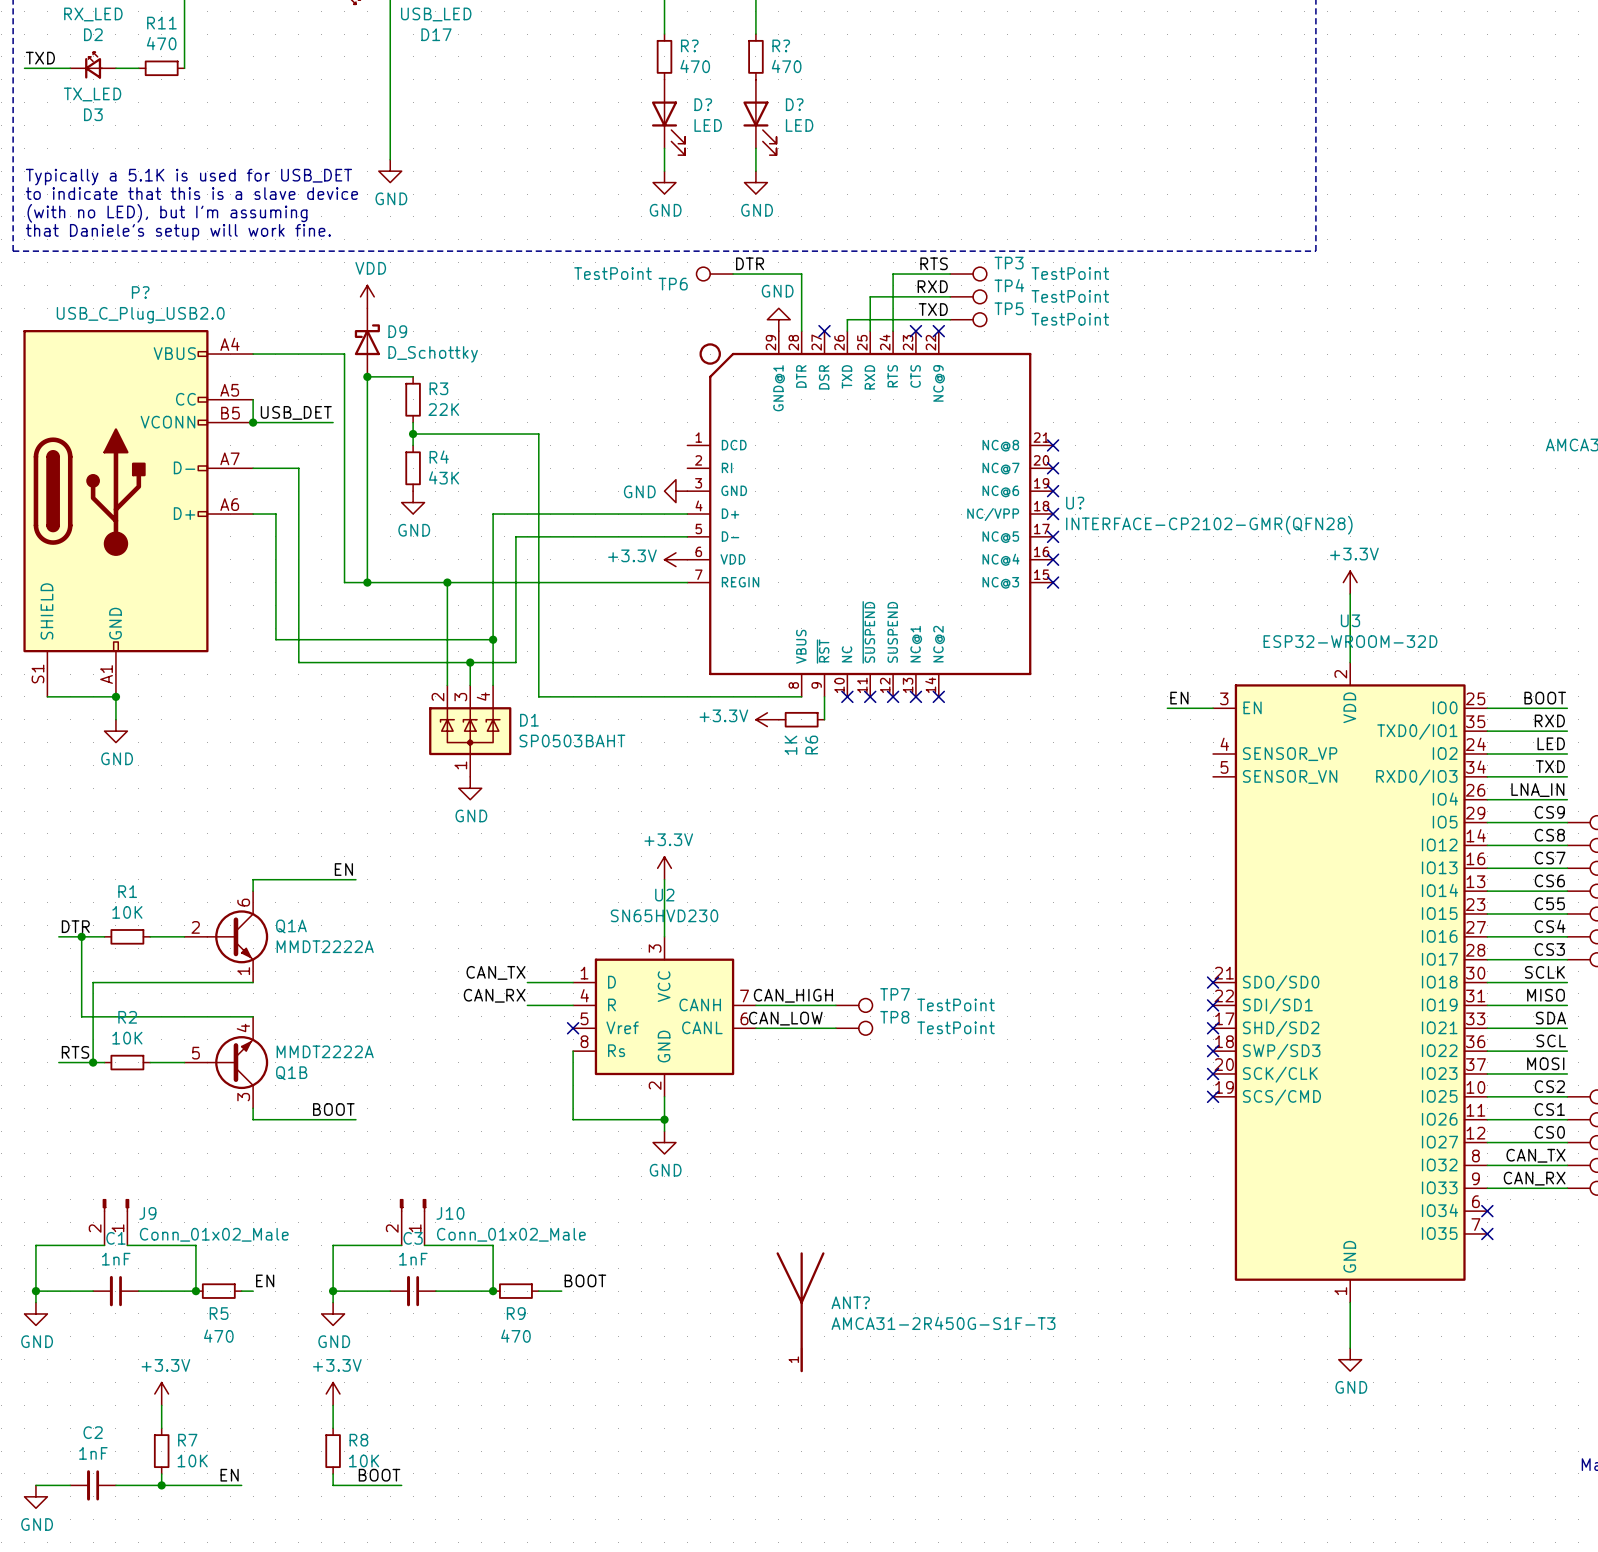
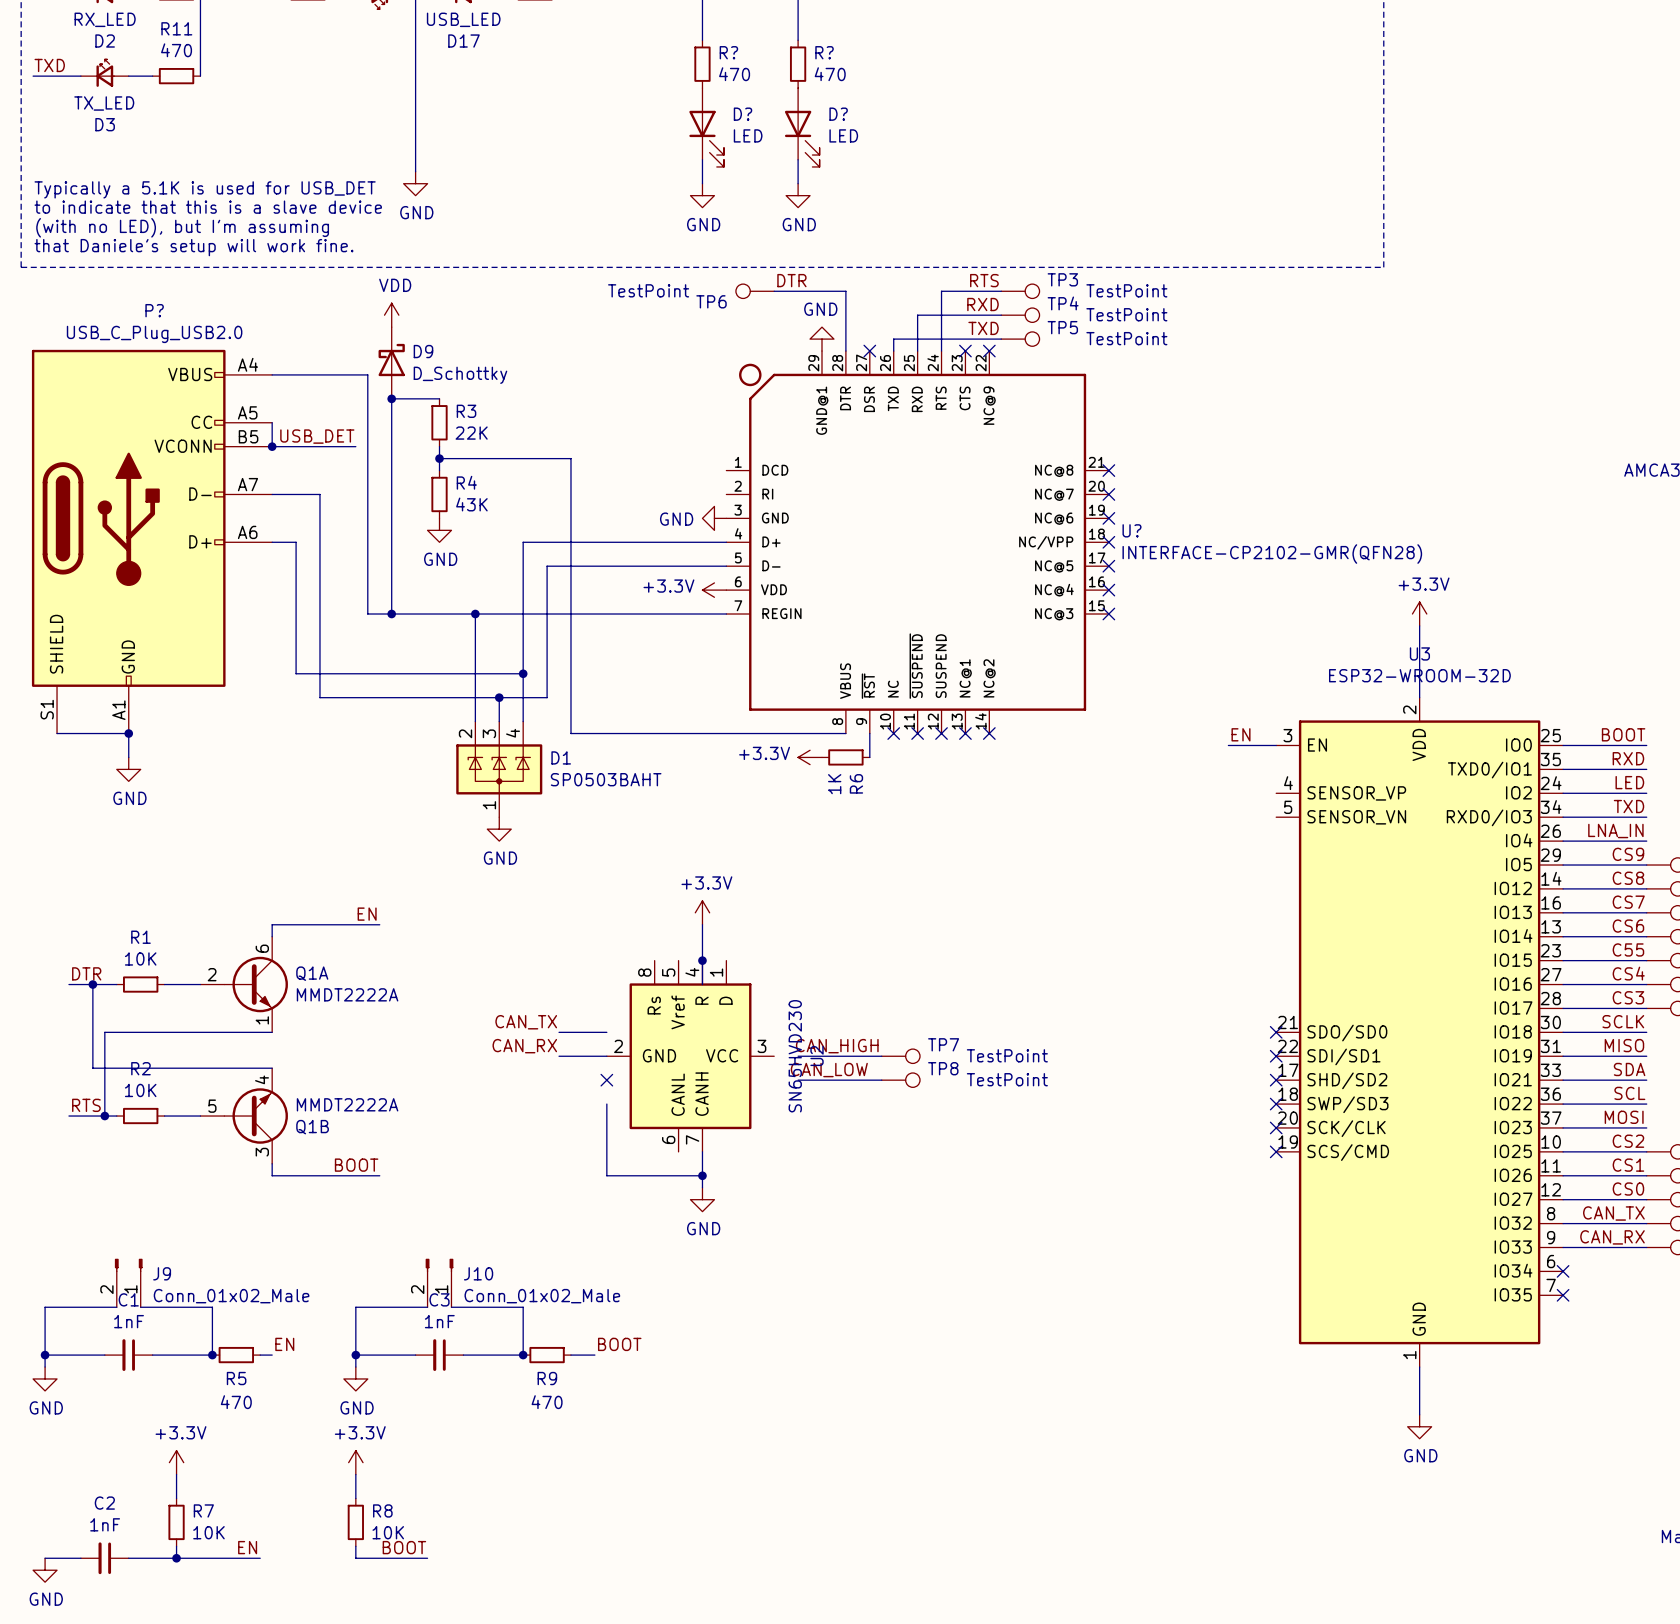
junction: none -> (702, 960)
U2 rotation: 0° (664, 1016) -> 90° clockwise (690, 1056)
ANT?: AMCA31-2R450G-S1F-T3 (800, 1312) -> none

